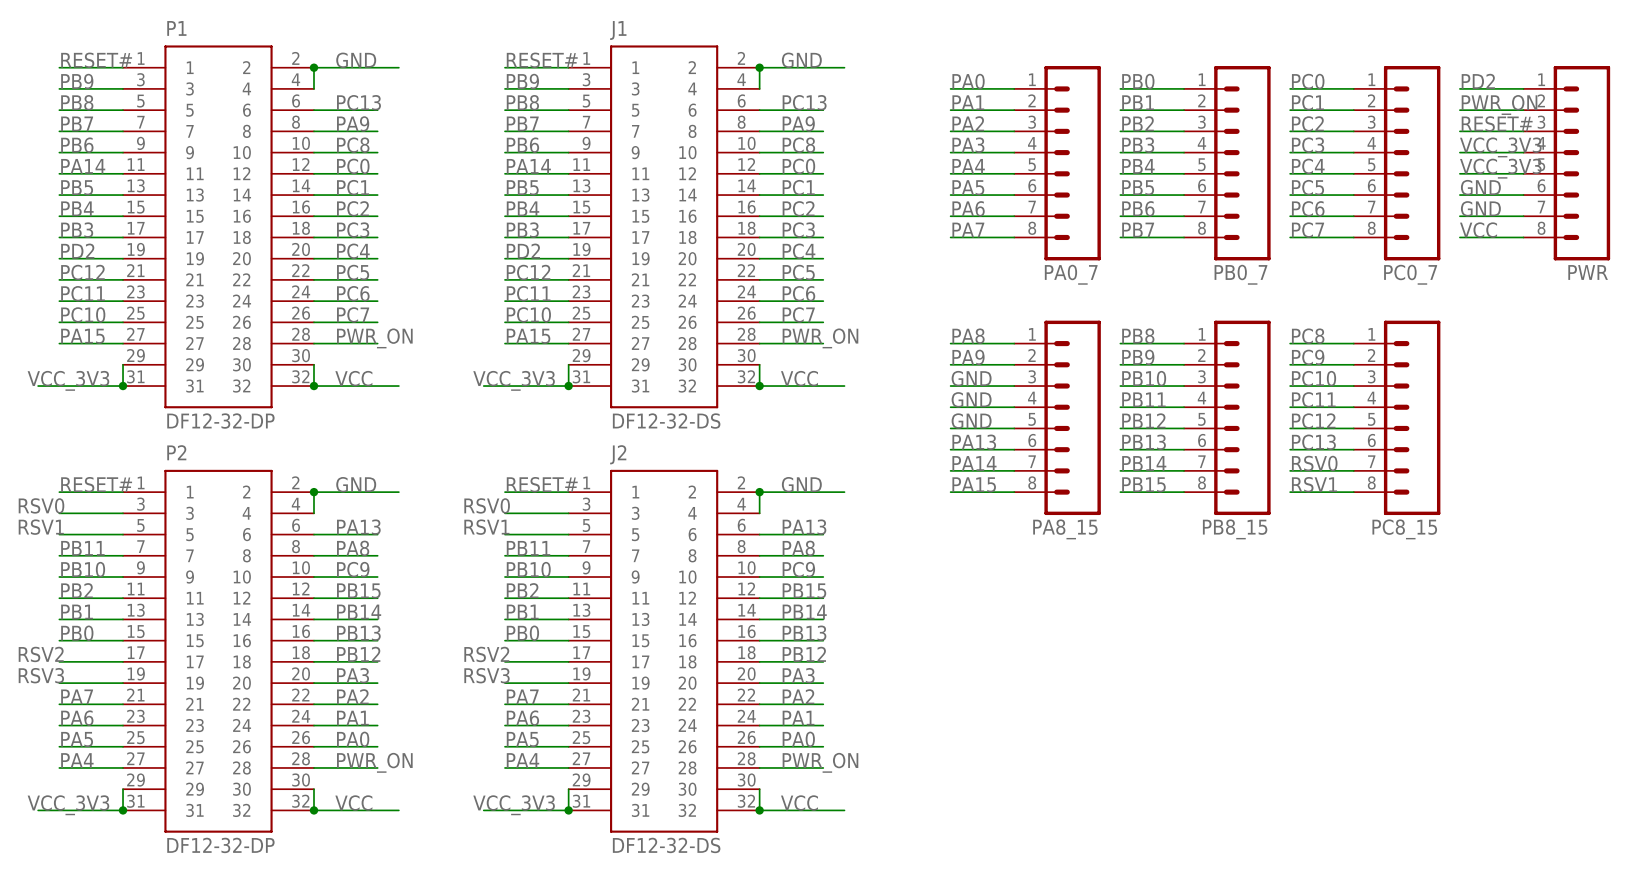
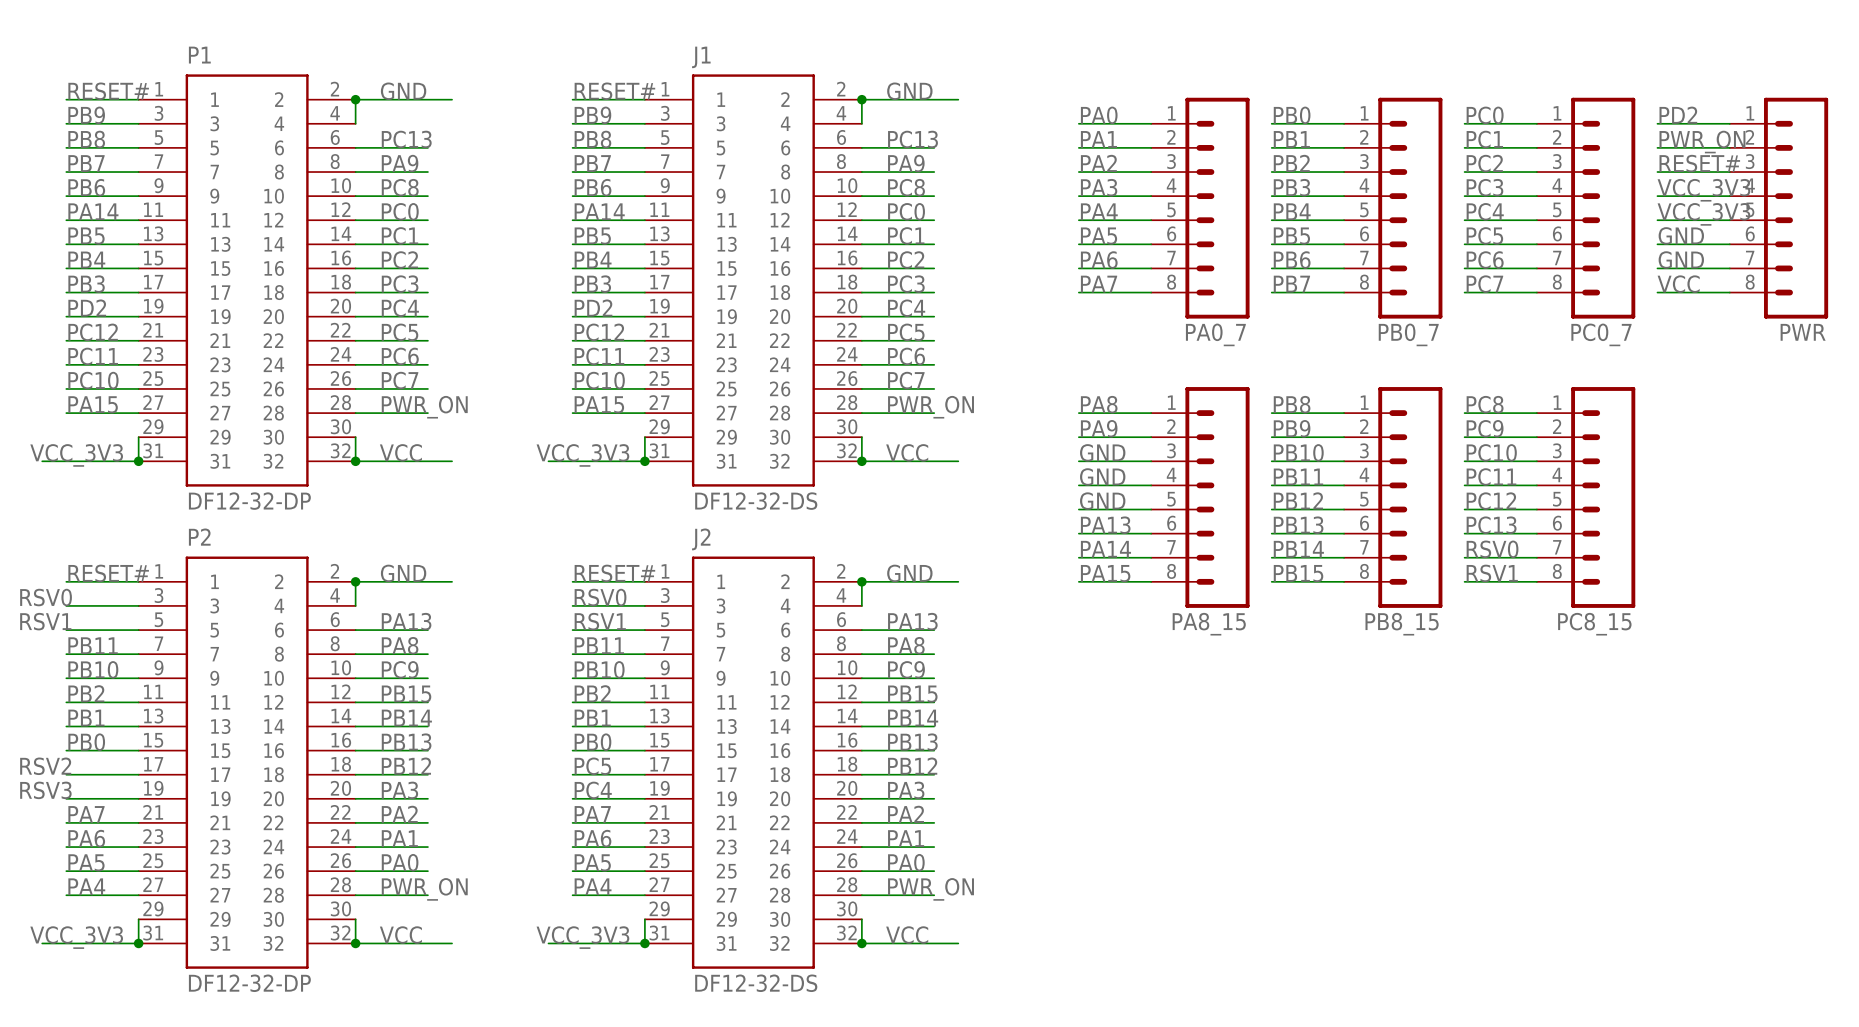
label position: RSV0 (487, 505) -> RSV0 (600, 597)
label position: RSV1 (486, 527) -> RSV1 (600, 621)
label: RSV2 (486, 654) -> none
label: none -> PC5 (592, 766)
label: RSV3 (487, 675) -> none
label: none -> PC4 (593, 790)

